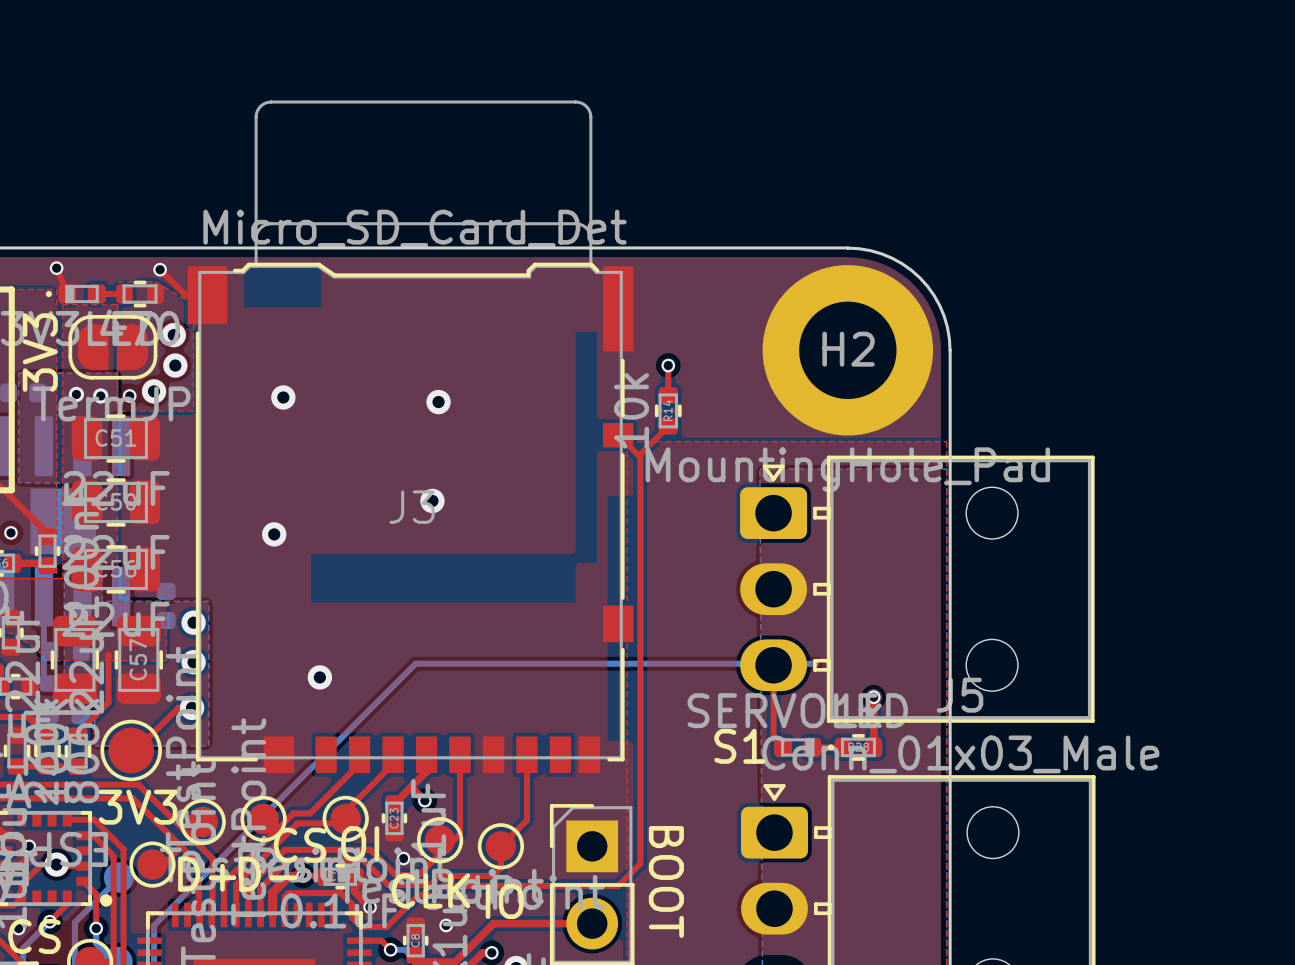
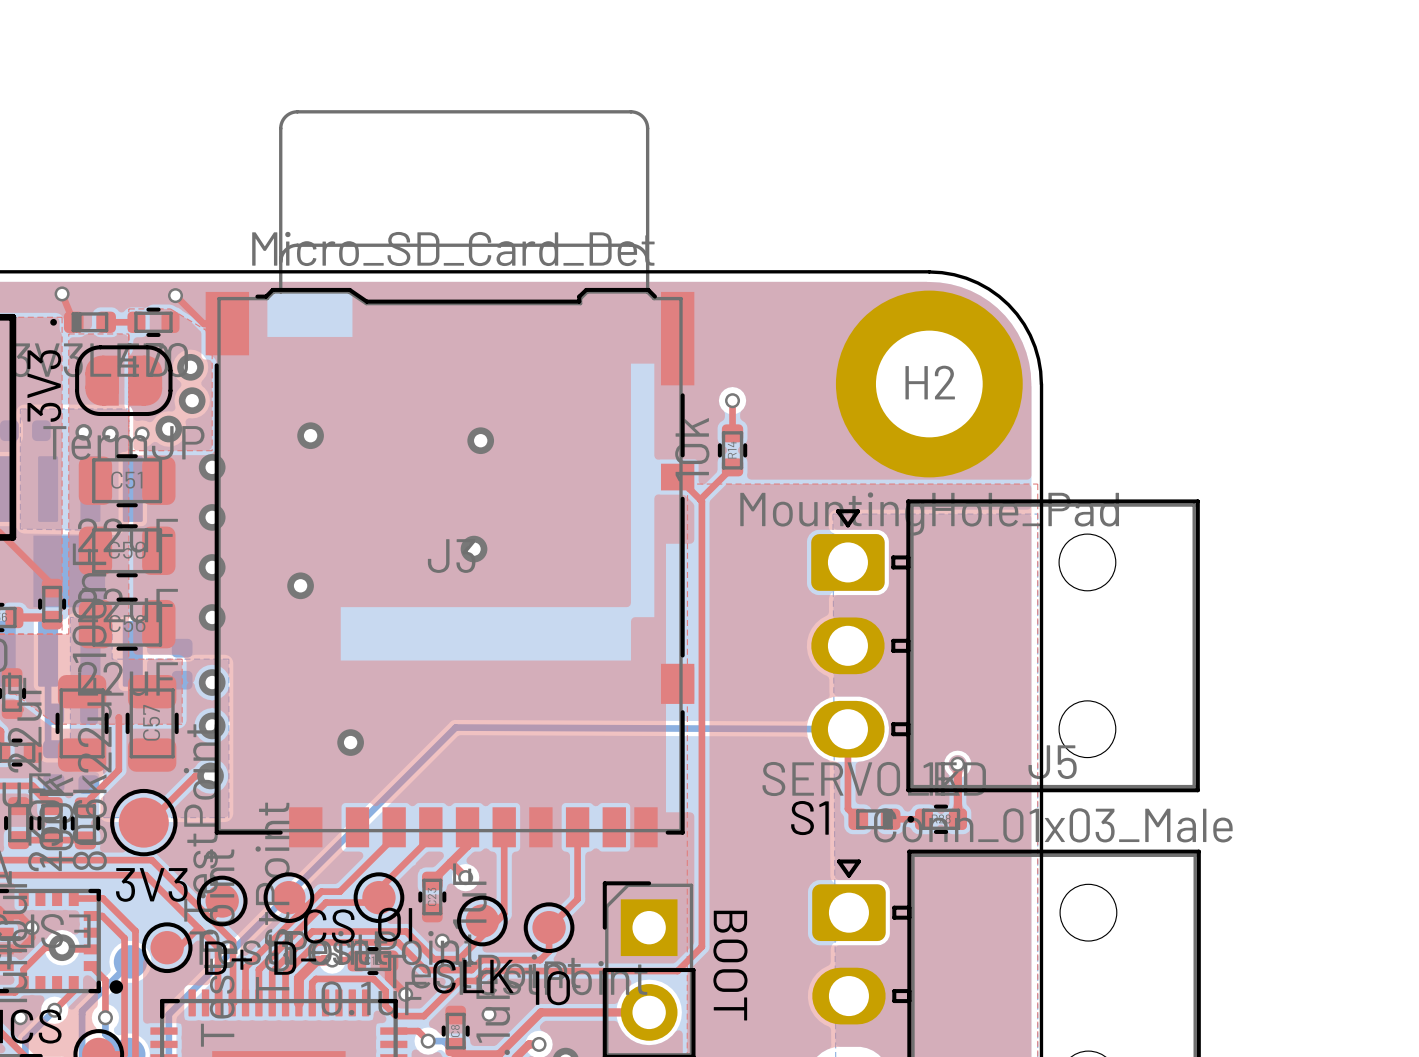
via: none -> (212, 467)
via: none -> (212, 517)
via: none -> (212, 567)
via: (10, 532) -> none
via: none -> (212, 617)
bottom track: (415, 663) (816, 663) -> (455, 727) (847, 729)

